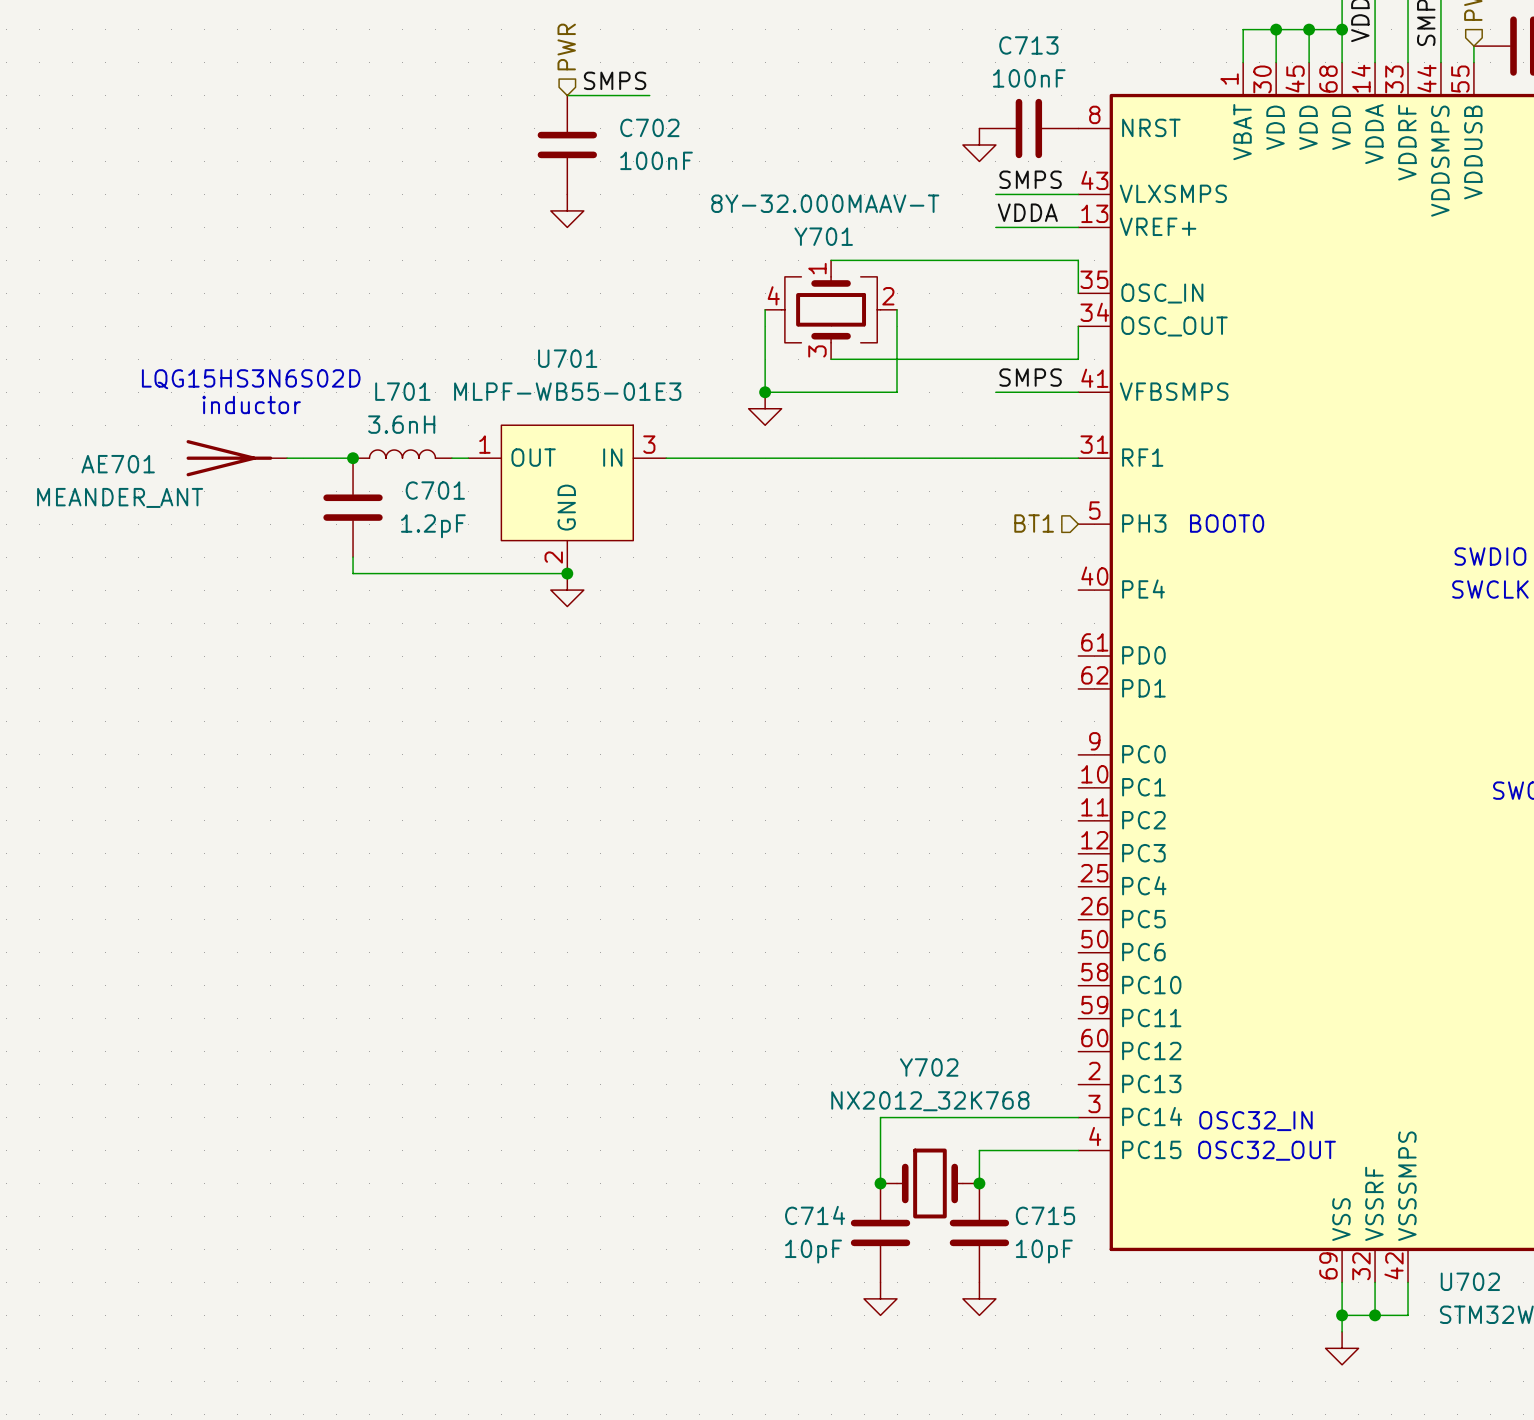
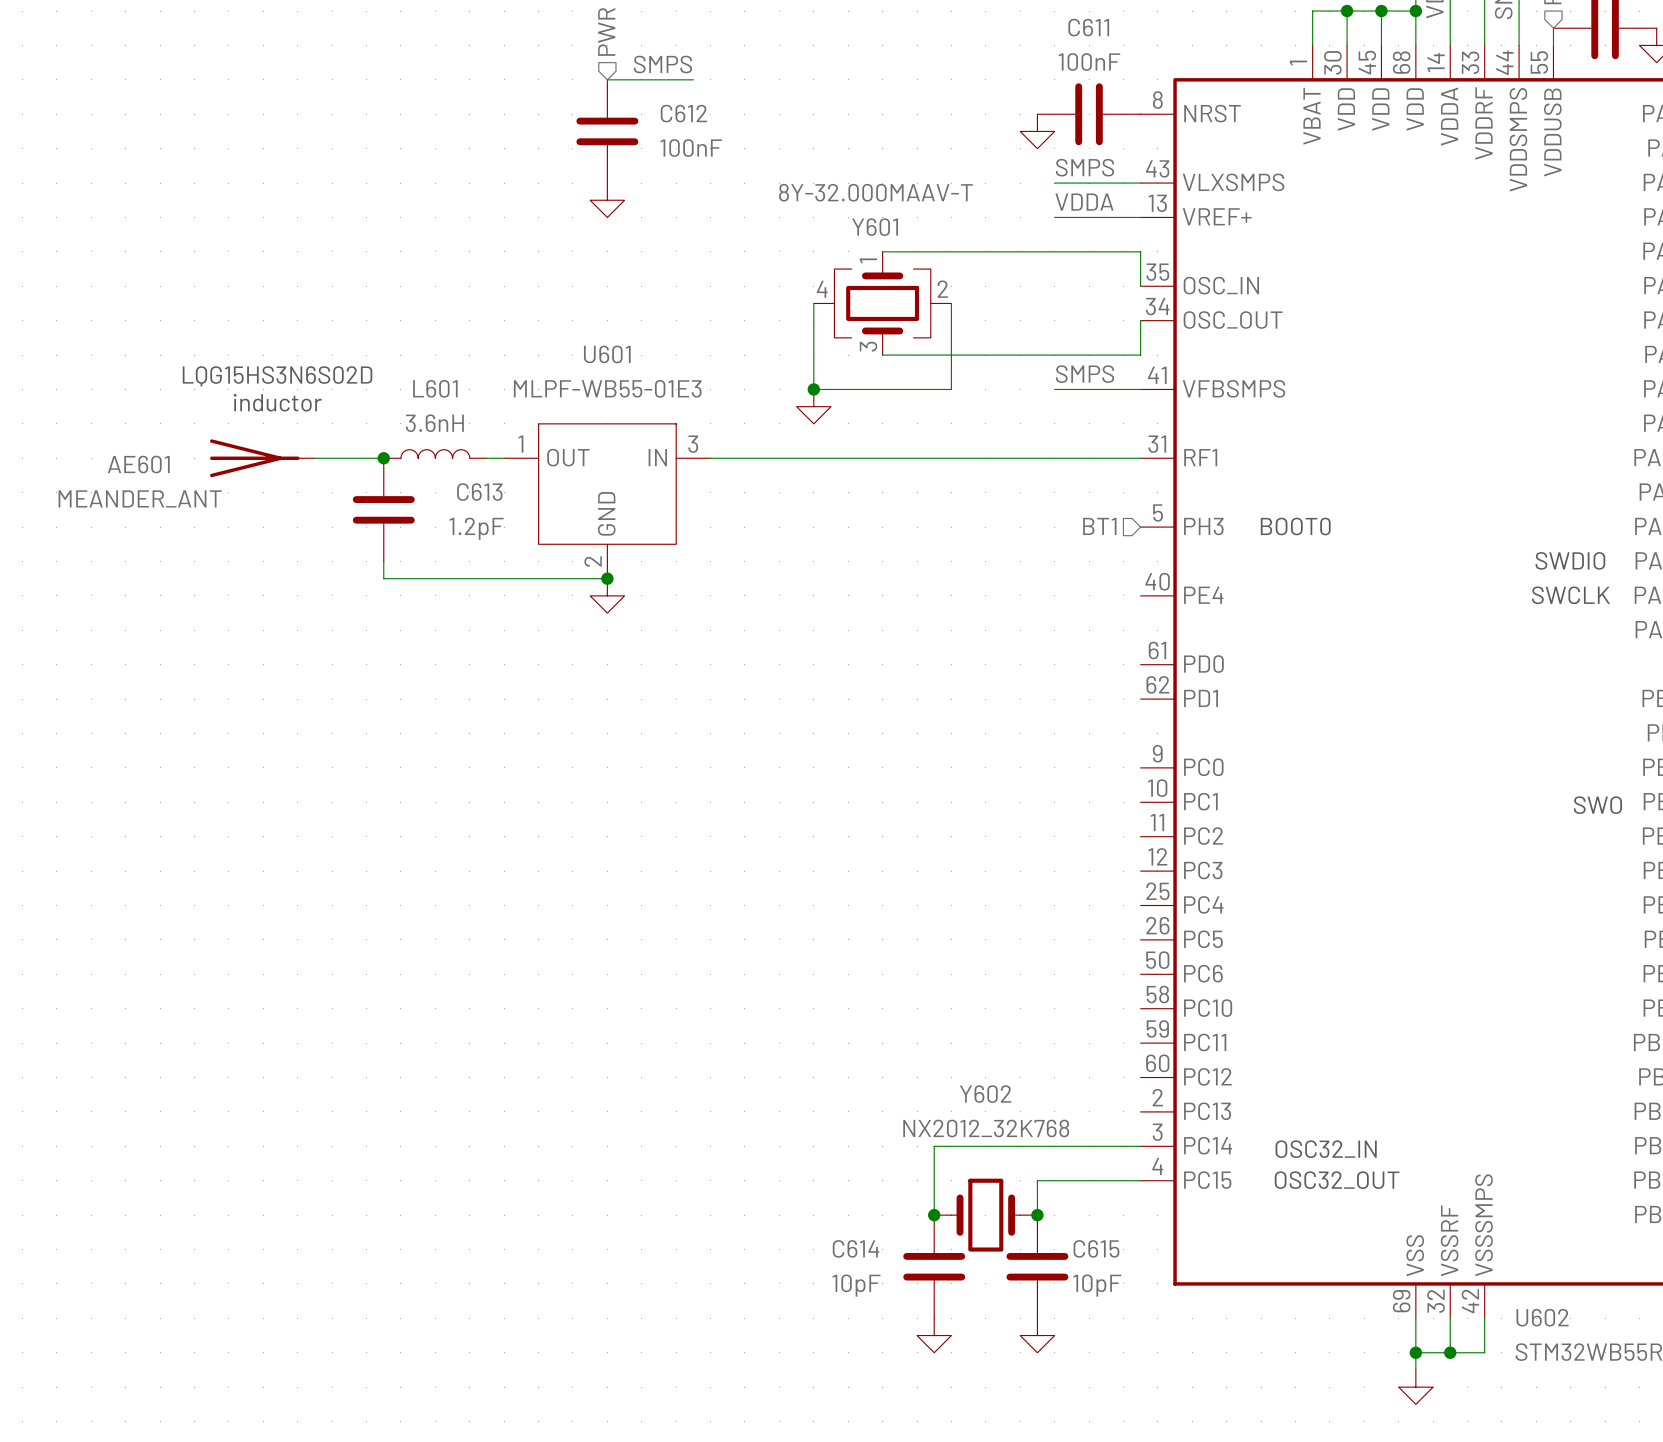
C713 name: C713 (1028, 45) -> C611 (1088, 27)
C702 name: C702 (649, 127) -> C612 (683, 113)
Y701 name: Y701 (823, 236) -> Y601 (875, 227)
U701 name: U701 (567, 358) -> U601 (607, 354)
L701 name: L701 (402, 391) -> L601 (435, 388)
AE701 name: AE701 (118, 464) -> AE601 (138, 464)
C701 name: C701 (435, 490) -> C613 (479, 492)
Y702 name: Y702 (929, 1067) -> Y602 (985, 1094)
C714 name: C714 (815, 1215) -> C614 (855, 1248)
C715 name: C715 (1045, 1215) -> C615 (1096, 1248)
U702 name: U702 (1470, 1281) -> U602 (1542, 1317)

